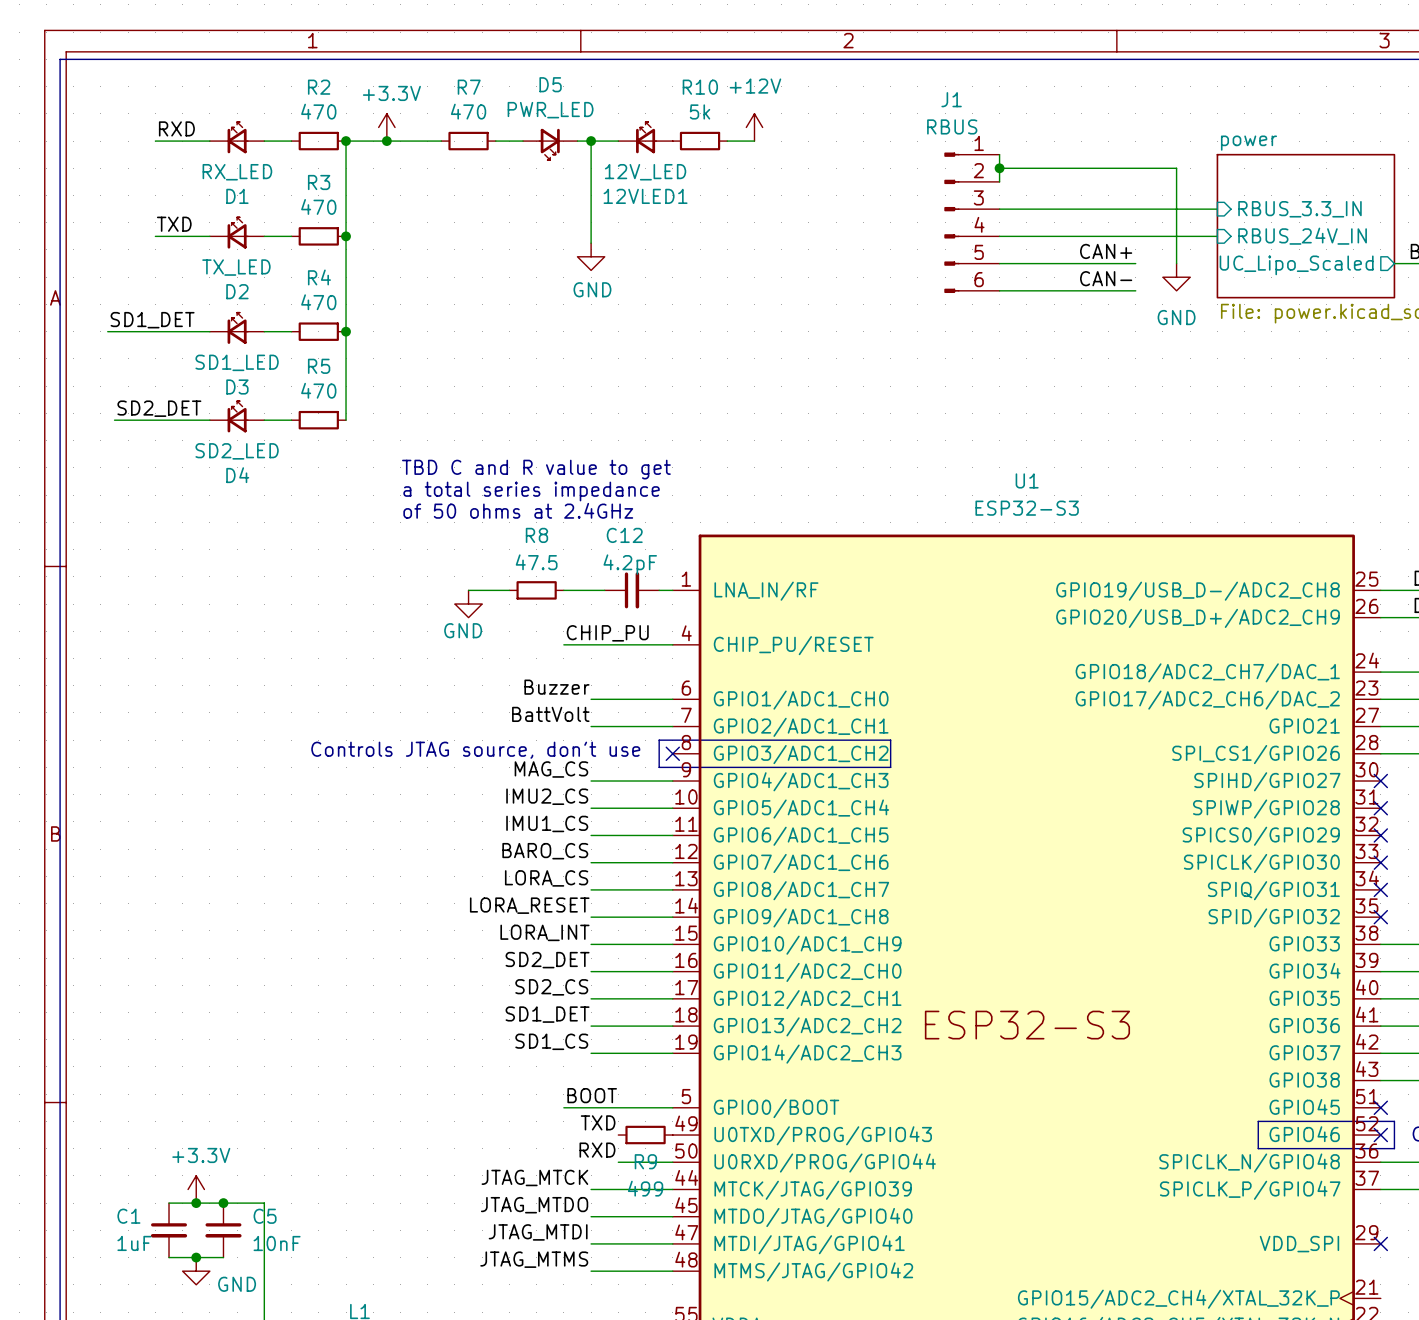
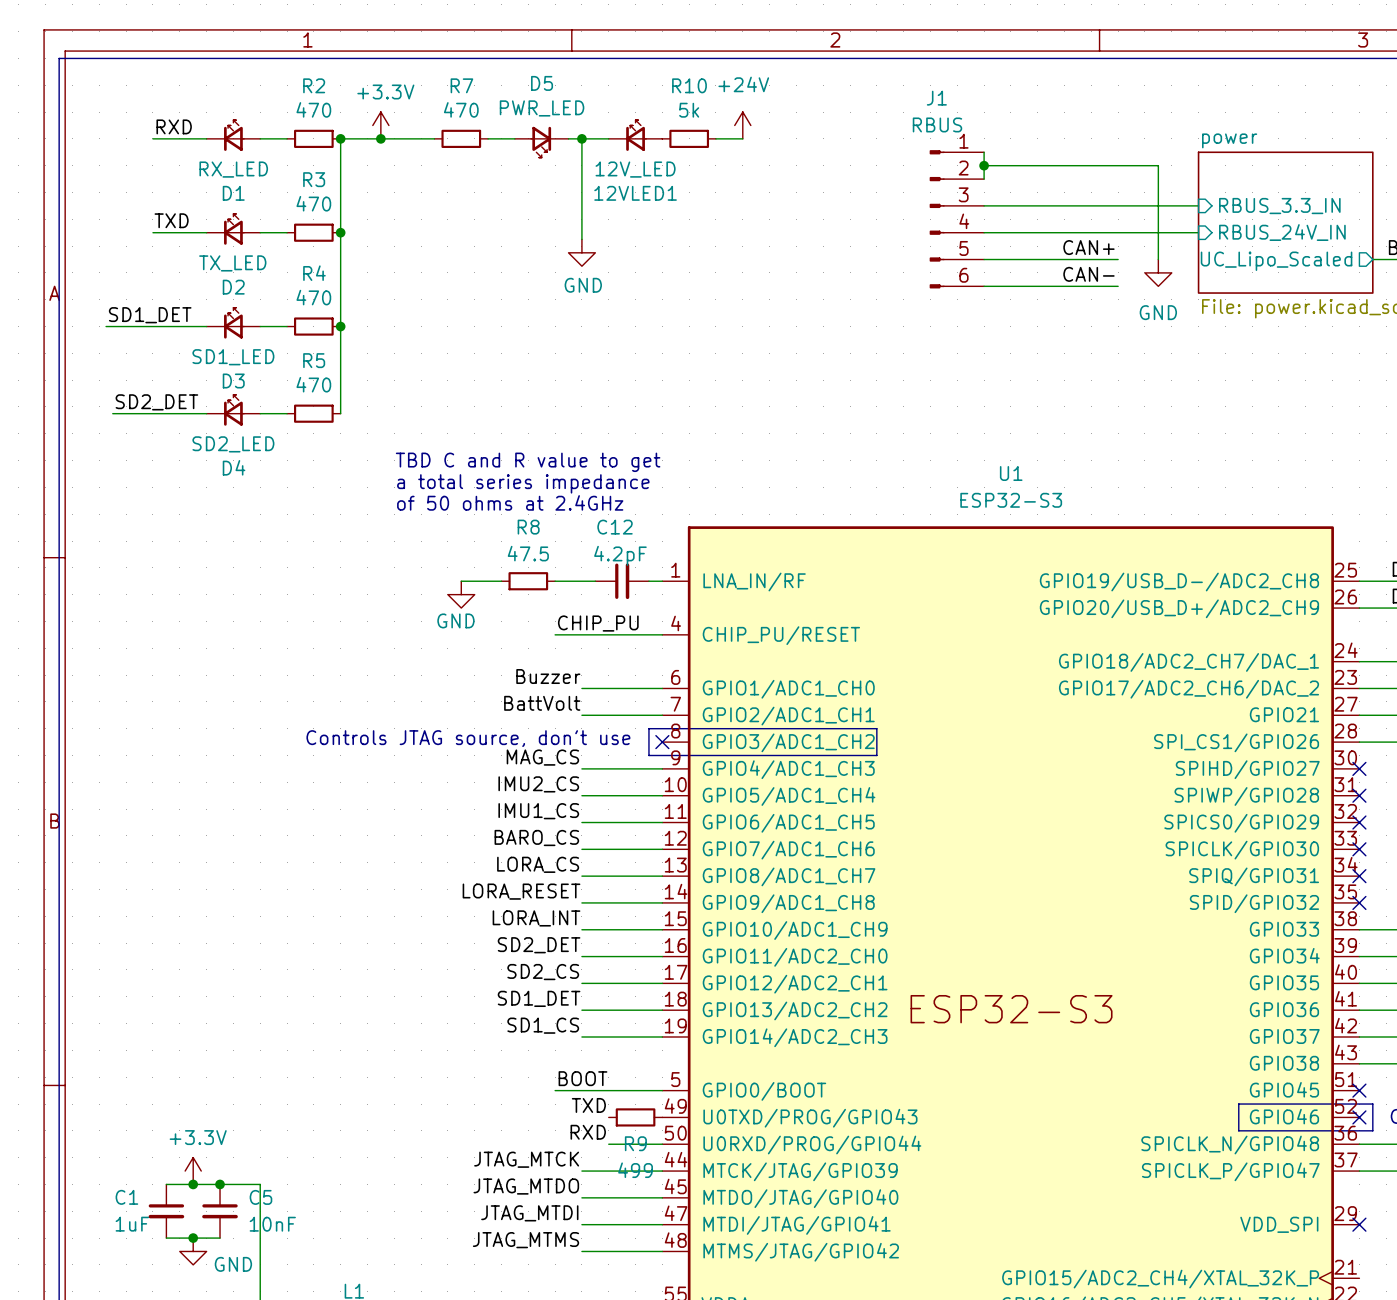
power symbol: +12V (754, 127) -> +24V (742, 125)

